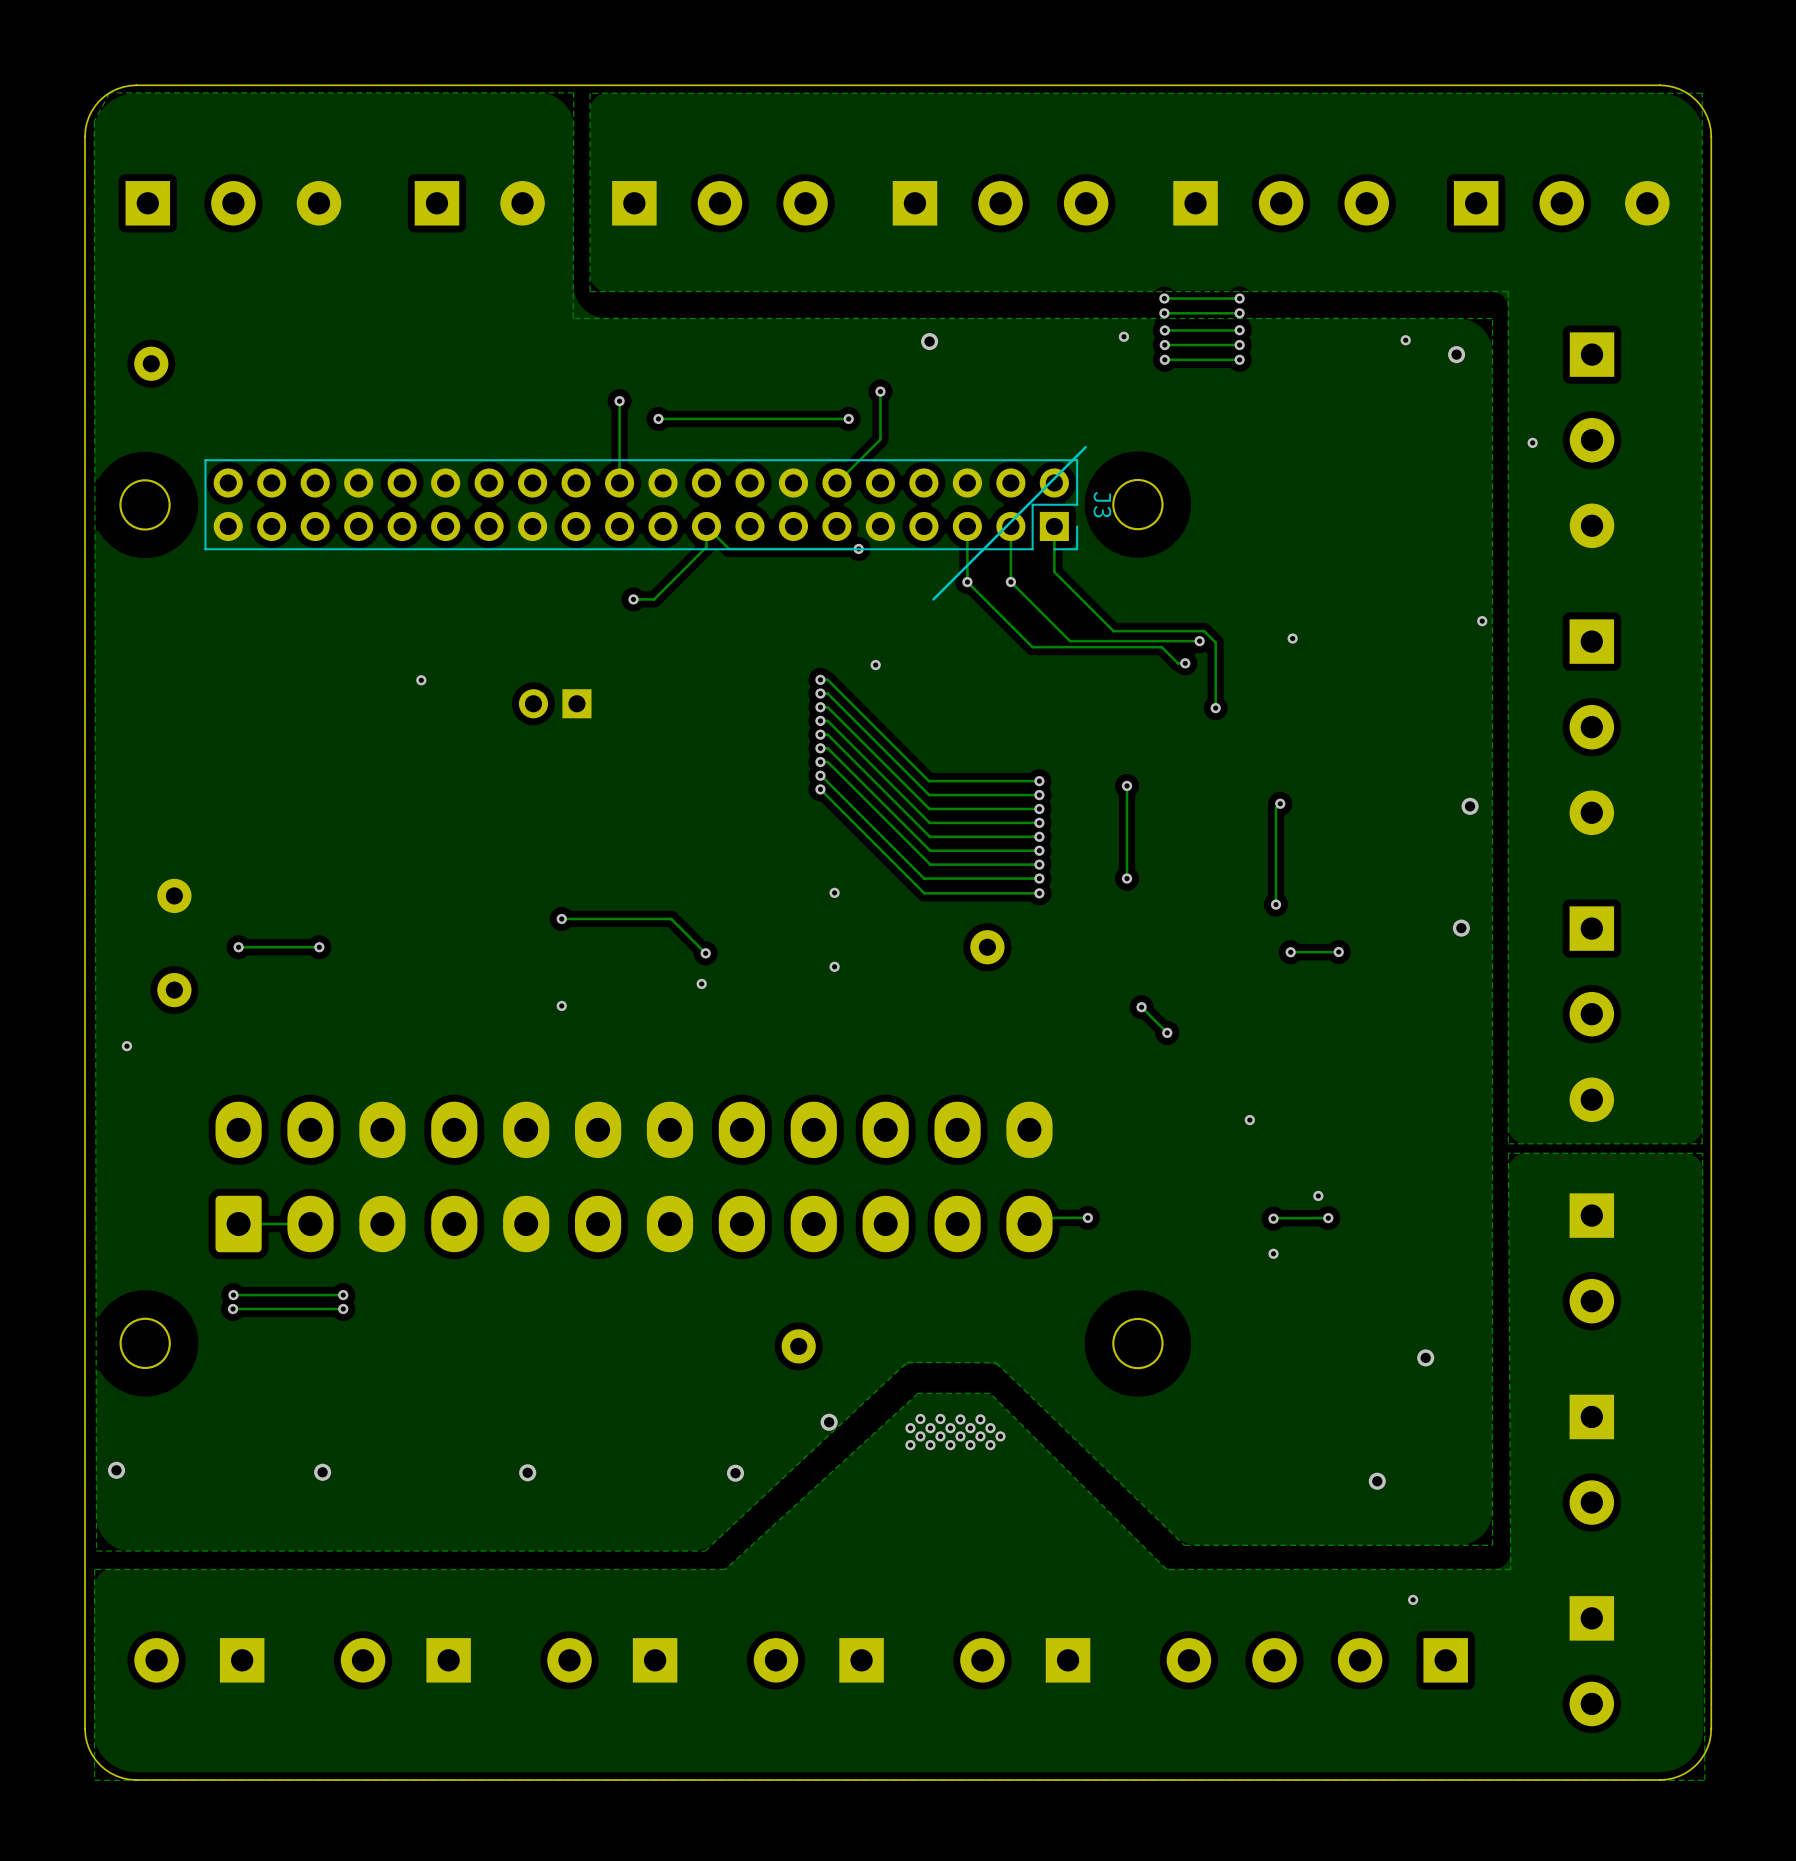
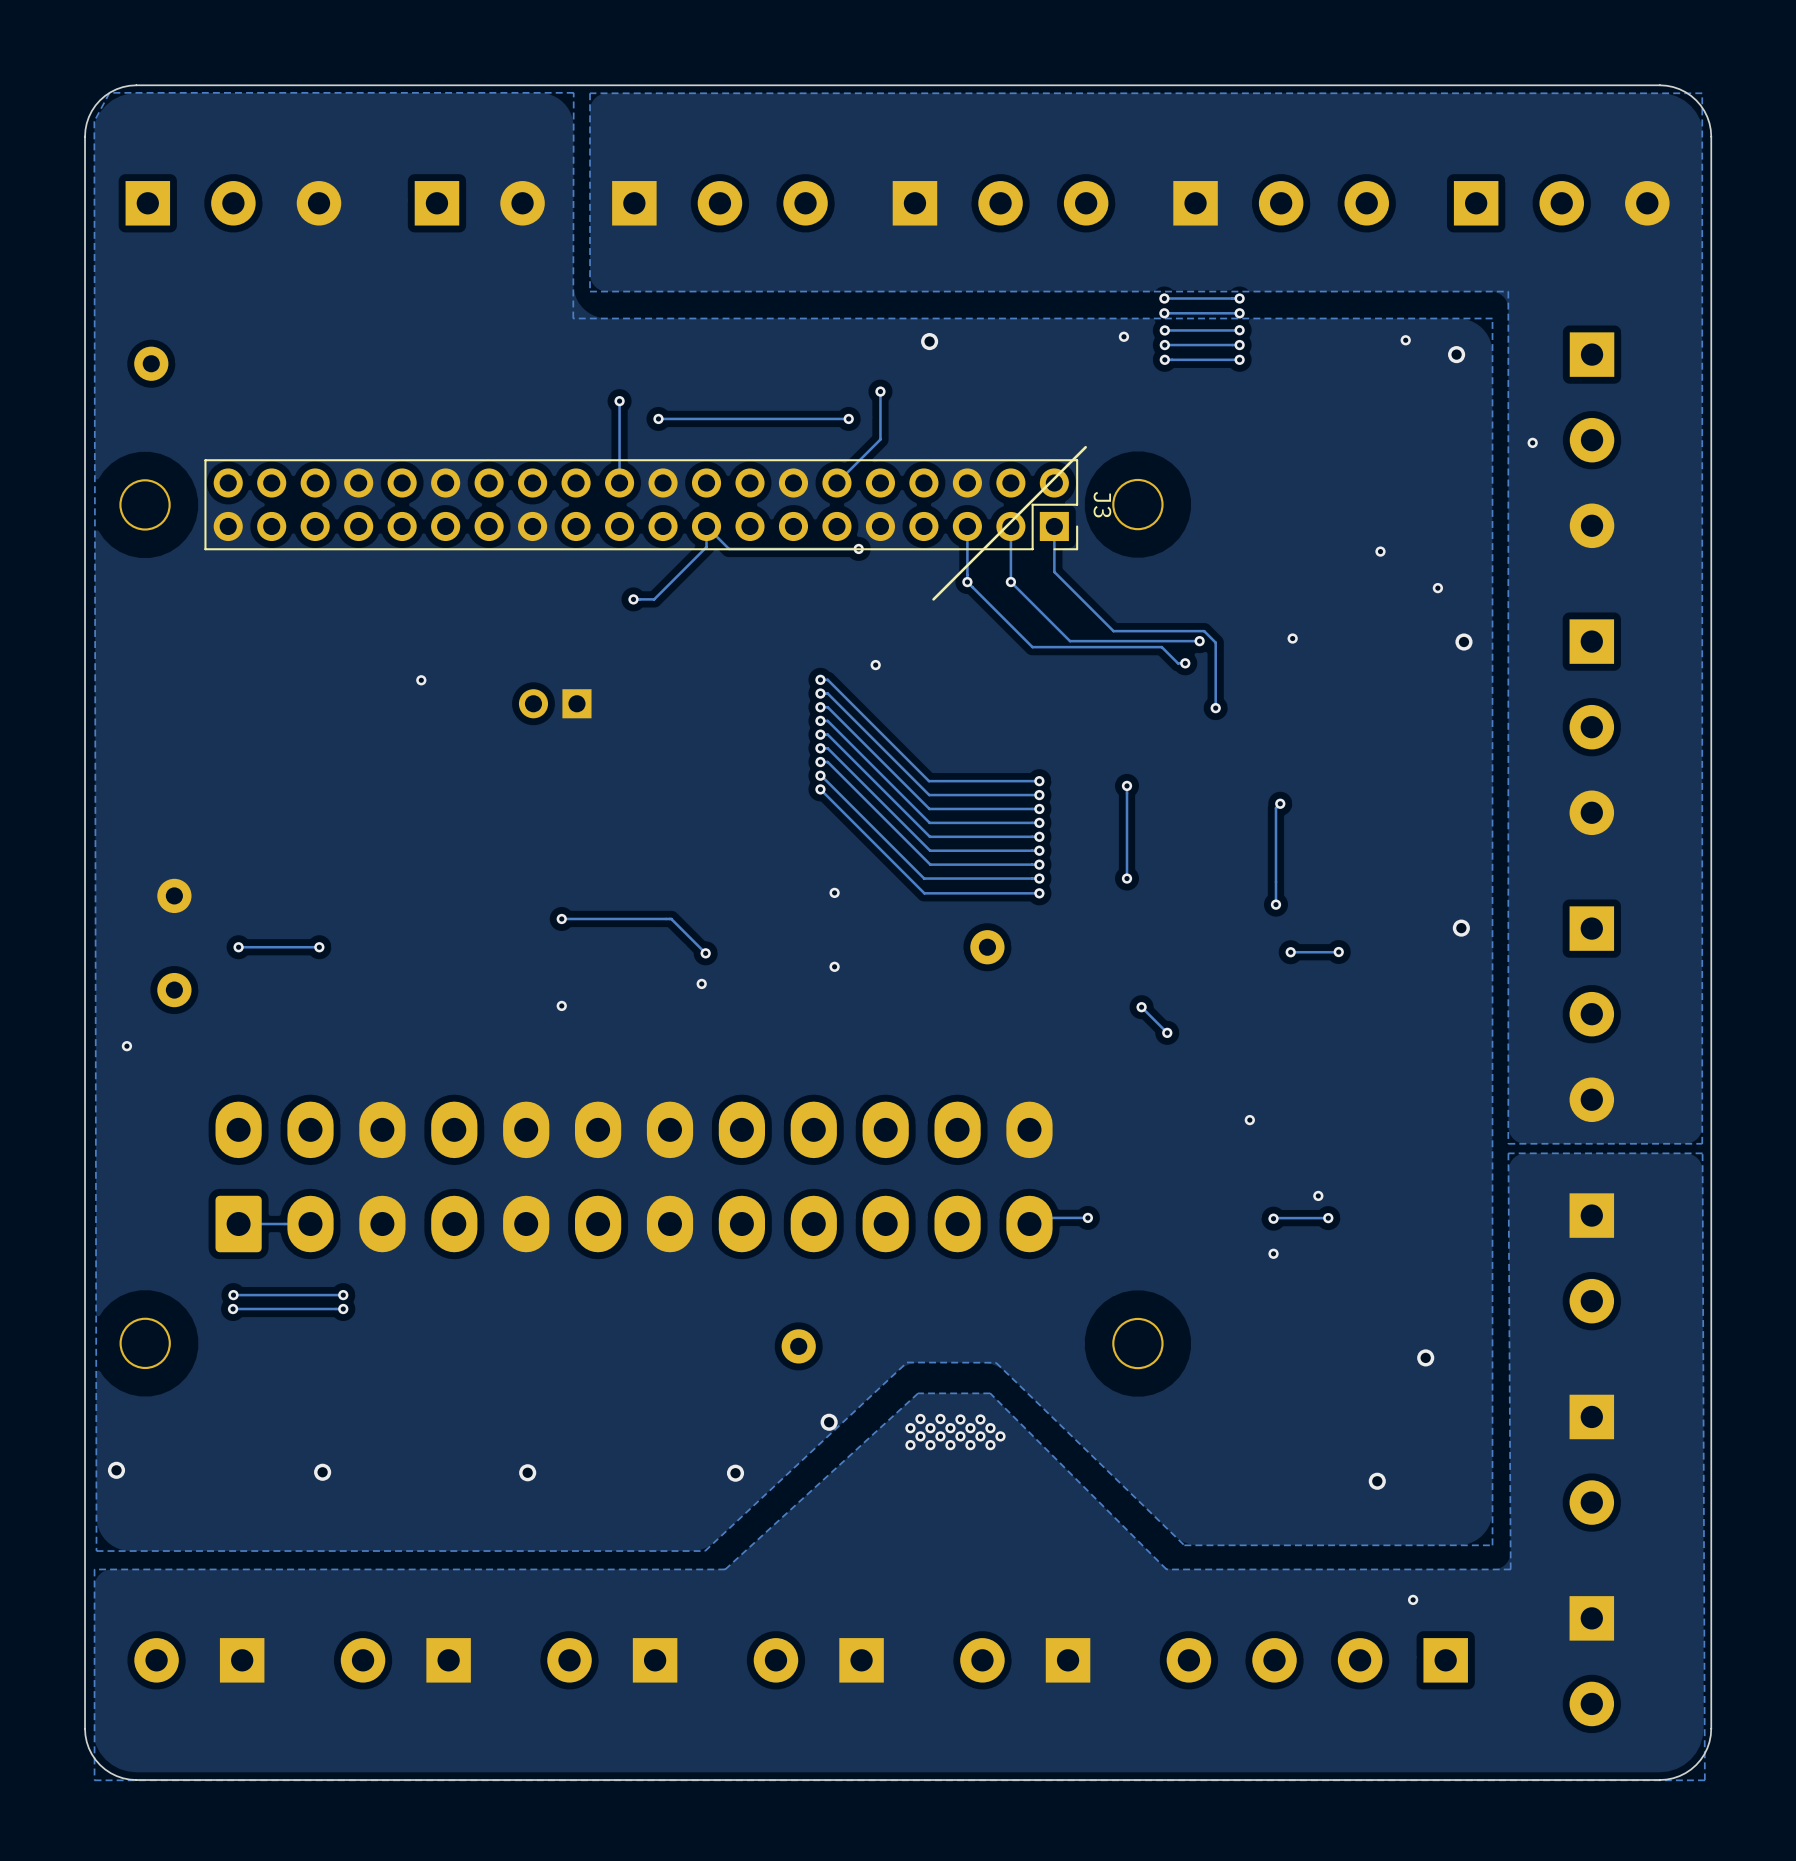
via: none -> (1380, 551)
via position: (1482, 621) -> (1437, 588)
via: none -> (1463, 642)
via: (1470, 806) -> none

